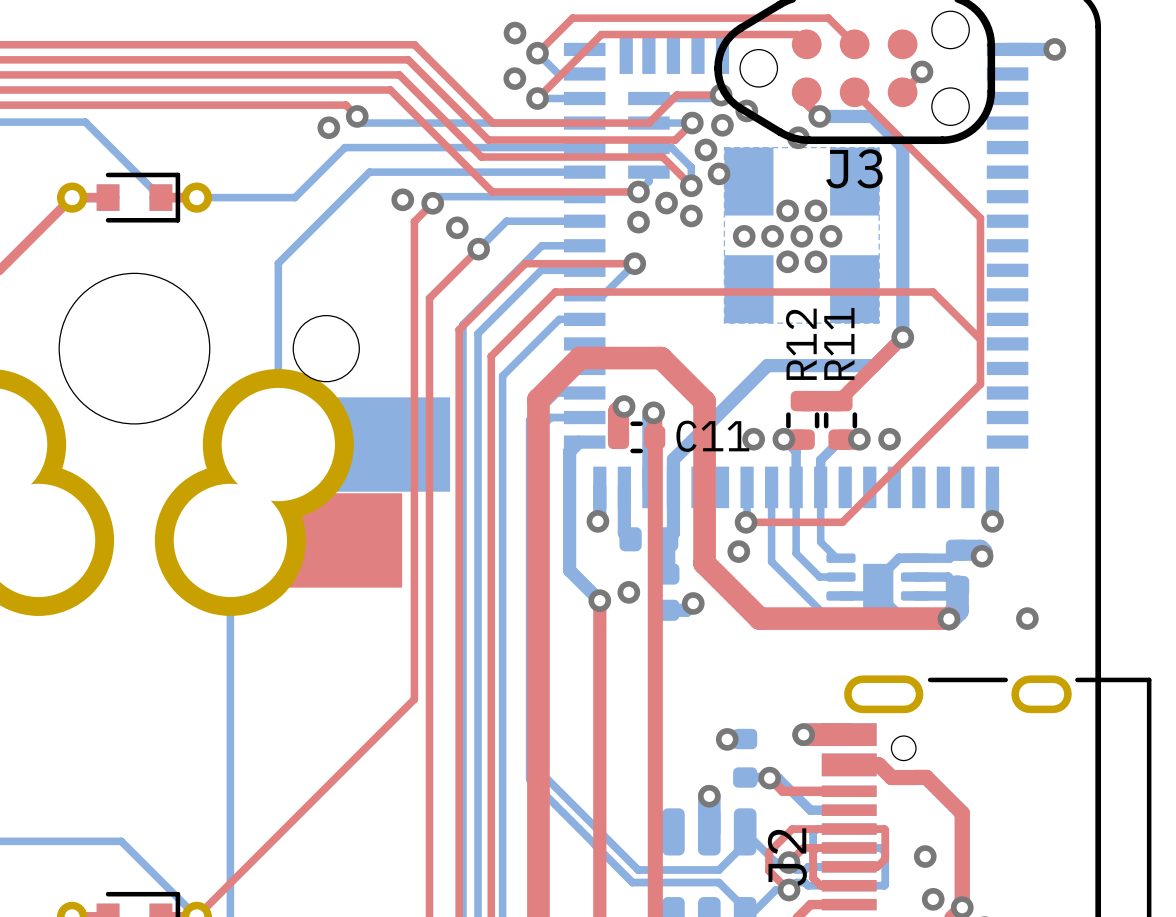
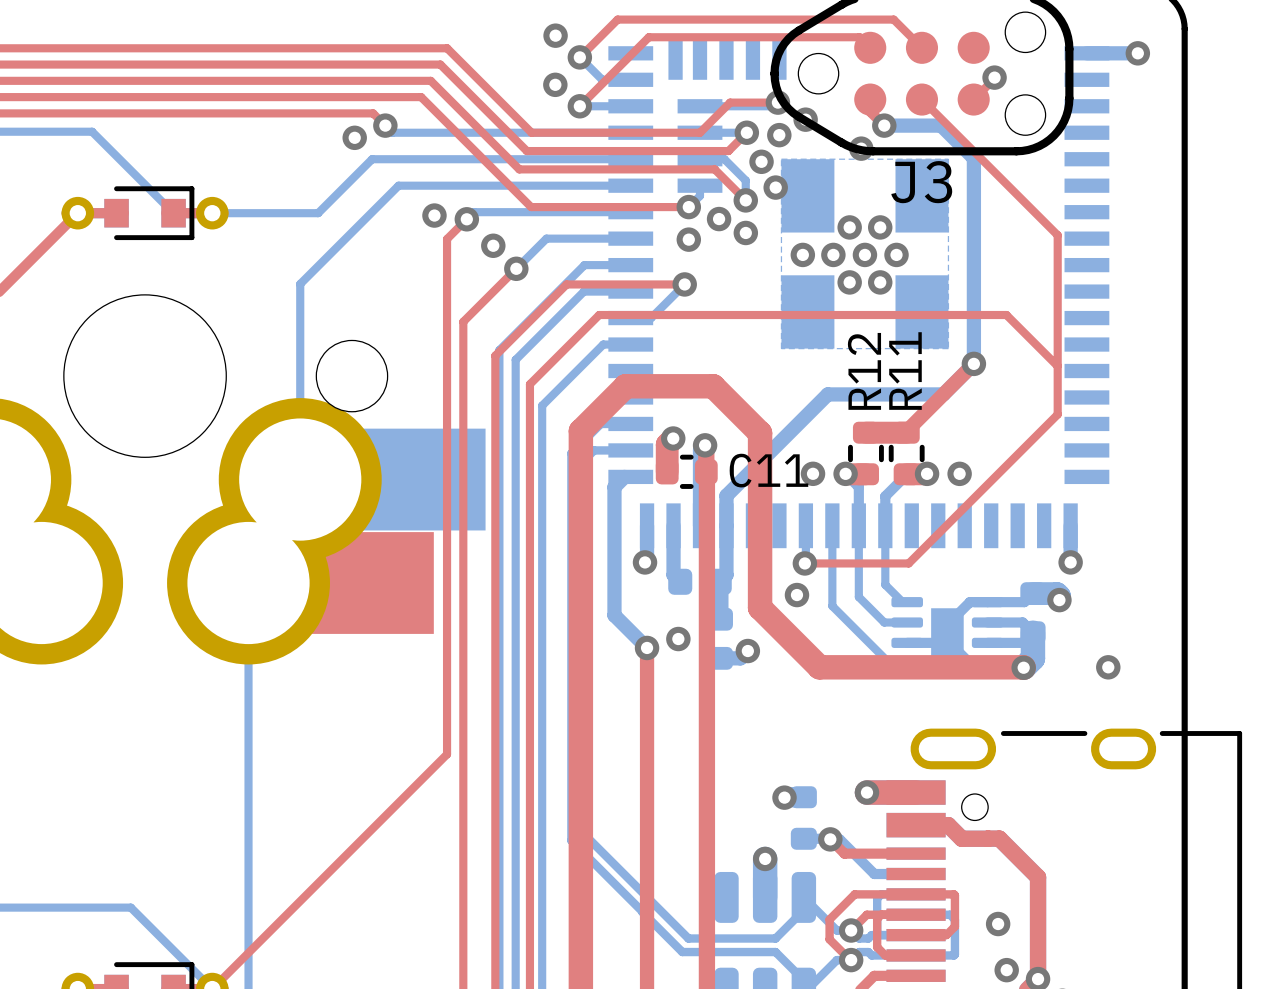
J2 name: J2 (787, 857) -> none

